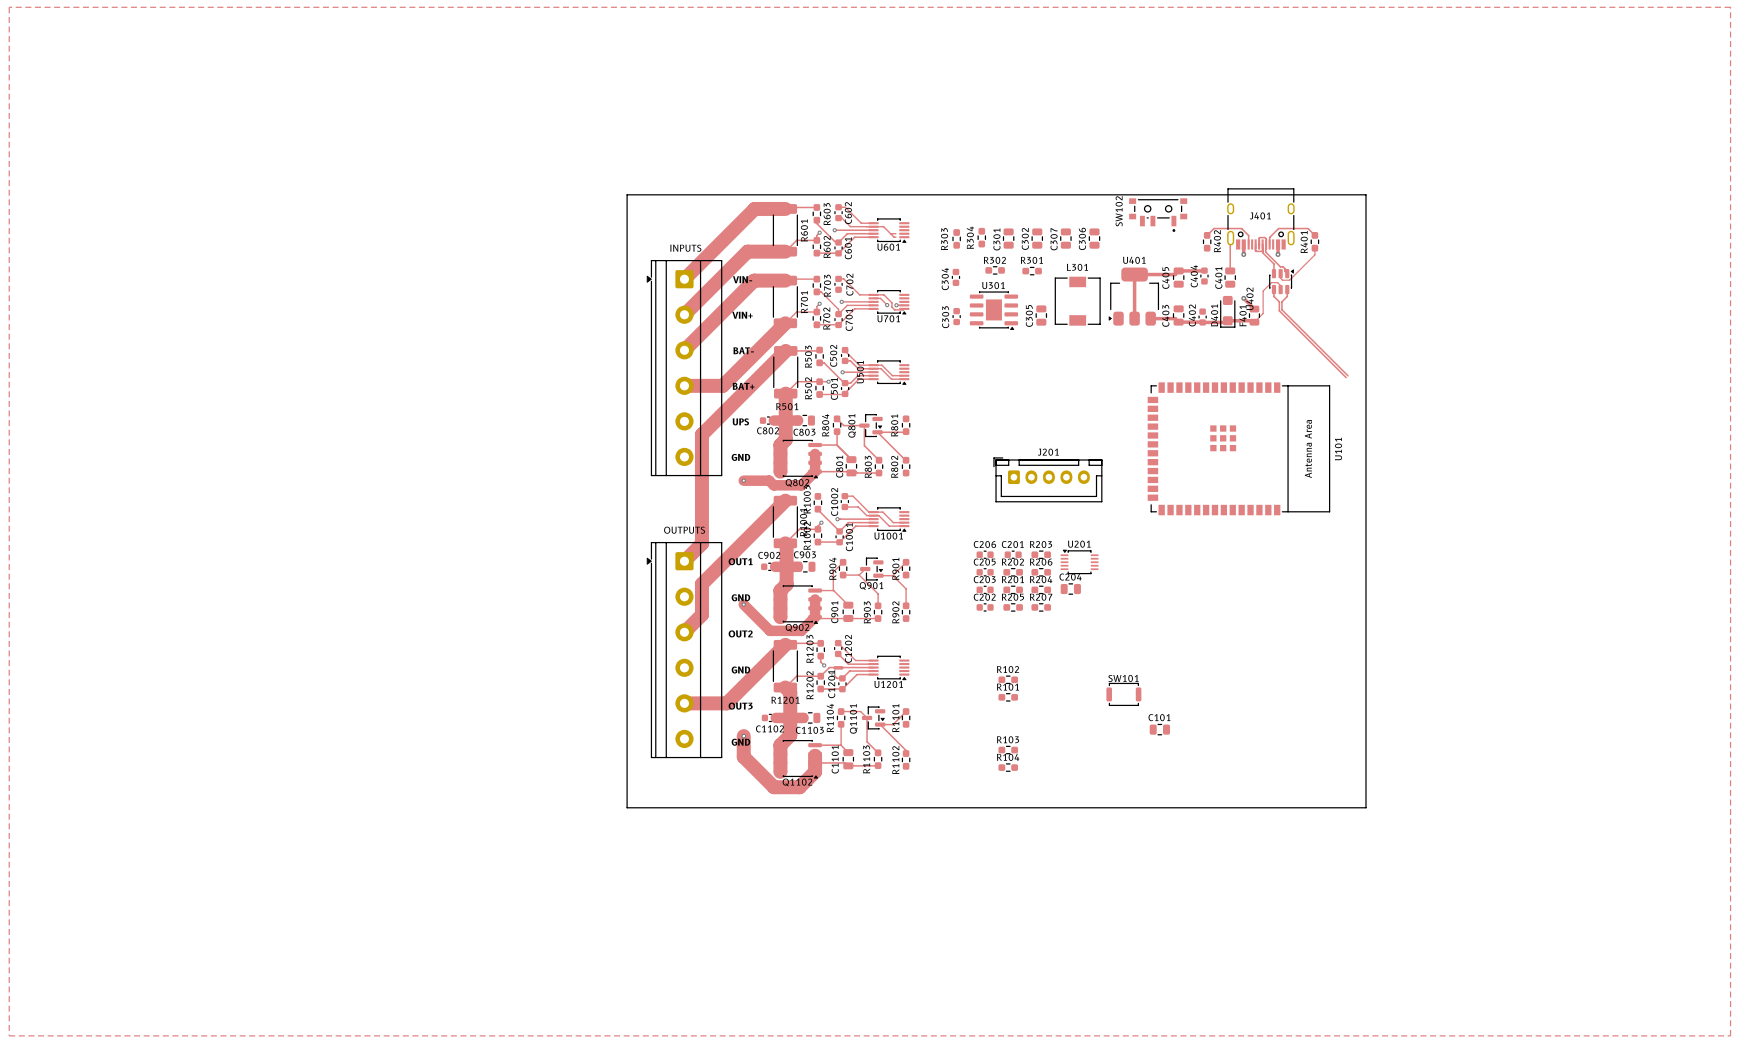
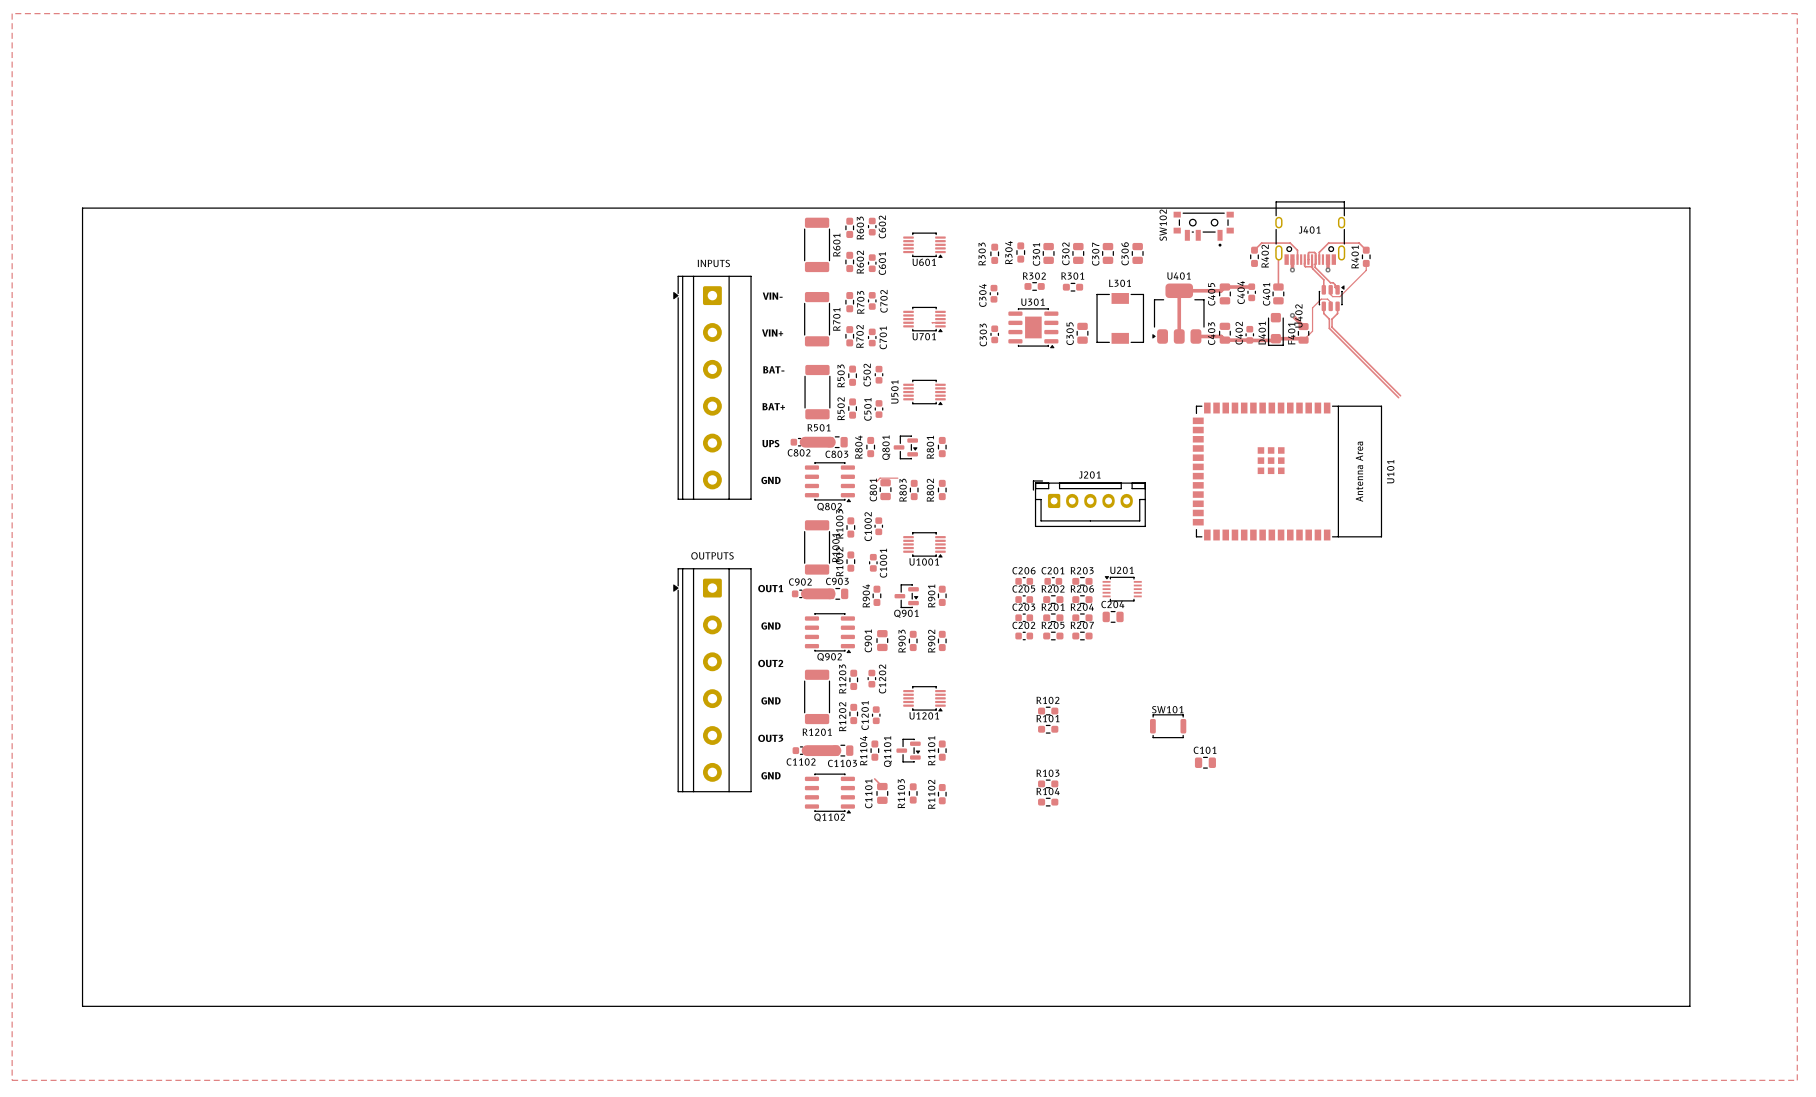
board edge: (627, 194) (627, 807) (1365, 807) (1365, 194) -> (652, 208) (82, 208) (82, 1006) (1689, 1006) (1689, 208) (1419, 208)
track: (786, 207) (816, 207) -> none
track: (838, 207) (845, 207) (861, 223) (873, 223) -> none
track: (785, 208) (754, 208) (684, 279) -> none
track: (838, 218) (841, 218) (850, 226) (866, 226) -> none
track: (816, 220) (816, 223) (835, 242) (838, 242) (847, 233) (873, 233) -> none
track: (866, 226) (883, 226) (895, 237) -> none
track: (834, 230) (873, 230) -> none
via: (834, 230) -> none
track: (819, 232) (816, 235) (816, 240) (796, 240) (785, 251) (747, 251) (684, 314) -> none
via: (819, 232) -> none
track: (890, 233) (895, 233) -> none
track: (873, 237) (854, 237) (838, 253) (816, 253) -> none
track: (838, 278) (843, 278) (859, 294) (883, 294) (891, 302) (891, 307) (894, 309) (904, 308) -> none
track: (786, 279) (816, 279) -> none
track: (785, 280) (754, 280) (684, 350) -> none
track: (816, 291) (821, 291) (838, 309) (838, 314) (847, 305) (873, 305) -> none
track: (873, 298) (880, 298) (887, 305) -> none
track: (841, 301) (873, 301) -> none
via: (841, 301) -> none
track: (819, 303) (816, 306) (816, 312) (796, 312) (722, 385) (684, 385) -> none
via: (819, 303) -> none
via: (887, 305) -> none
via: (896, 305) -> none
track: (873, 308) (854, 308) (838, 325) (816, 324) -> none
track: (820, 350) (785, 350) (701, 434) (701, 543) (684, 561) -> none
track: (845, 350) (859, 365) (881, 365) (892, 375) (903, 375) -> none
track: (845, 360) (850, 360) (858, 368) (872, 368) -> none
track: (820, 362) (824, 362) (844, 383) (850, 383) (858, 375) (872, 375) -> none
track: (872, 368) (880, 368) (891, 379) -> none
track: (842, 372) (872, 372) -> none
via: (842, 372) -> none
track: (872, 379) (858, 379) (844, 394) (819, 394) -> none
track: (891, 379) (903, 379) -> none
track: (828, 381) (797, 381) (785, 393) (785, 439) (780, 445) (780, 471) -> none
via: (828, 381) -> none
track: (837, 418) (843, 425) (864, 425) (864, 445) (879, 460) -> none
track: (837, 431) (837, 445) -> none
track: (904, 431) (877, 432) (904, 460) -> none
track: (820, 445) (836, 445) (851, 459) -> none
track: (815, 453) (815, 471) (801, 485) (773, 485) (769, 480) (743, 480) -> none
track: none -> (897, 478) (880, 478) (876, 481)
track: (820, 471) (879, 473) -> none
via: (743, 480) -> none
track: (844, 496) (852, 496) (868, 512) (882, 512) (893, 522) (904, 522) -> none
track: (785, 500) (701, 584) (701, 614) (684, 632) -> none
track: (844, 507) (858, 507) (866, 515) (878, 515) (889, 526) (904, 526) -> none
track: (817, 509) (839, 531) (848, 522) (873, 522) -> none
via: (837, 519) -> none
track: (840, 519) (873, 519) -> none
track: (821, 522) (817, 529) (799, 529) (785, 543) (786, 584) (780, 590) (780, 617) -> none
via: (821, 522) -> none
track: (873, 526) (855, 526) (839, 542) (817, 542) -> none
track: (843, 562) (833, 572) (833, 590) -> none
track: (906, 562) (892, 575) (878, 575) -> none
track: (865, 569) (859, 575) -> none
track: (843, 575) (859, 575) -> none
track: (859, 575) (878, 593) (878, 605) -> none
track: (892, 575) (906, 588) (906, 605) -> none
track: (815, 590) (833, 590) (848, 605) -> none
track: (815, 599) (815, 617) -> none
track: (743, 604) (770, 630) (801, 630) (815, 617) -> none
via: (743, 604) -> none
track: (815, 617) (878, 618) -> none
track: (820, 643) (786, 643) (726, 703) (684, 703) -> none
track: (838, 643) (855, 660) (873, 660) -> none
track: (838, 653) (848, 664) (873, 664) -> none
track: (820, 656) (820, 661) (824, 665) -> none
via: (824, 665) -> none
part: (838, 667) -> none
track: (873, 667) (829, 667) (820, 676) (796, 676) (785, 687) (790, 692) (790, 735) (780, 745) (780, 771) -> none
track: (873, 671) (849, 671) (842, 678) (837, 678) (833, 674) -> none
via: (833, 674) -> none
track: (873, 674) (857, 674) (842, 689) (820, 688) -> none
track: (841, 711) (860, 711) (867, 717) (867, 741) (878, 752) -> none
track: (906, 711) (893, 724) (880, 724) (906, 750) (906, 753) -> none
track: (841, 724) (840, 745) (815, 745) -> none
track: (743, 736) (743, 756) (774, 787) (799, 787) (815, 771) (815, 755) -> none
via: (743, 736) -> none
track: (878, 765) (848, 765) (845, 762) (815, 762) (817, 765) -> none

